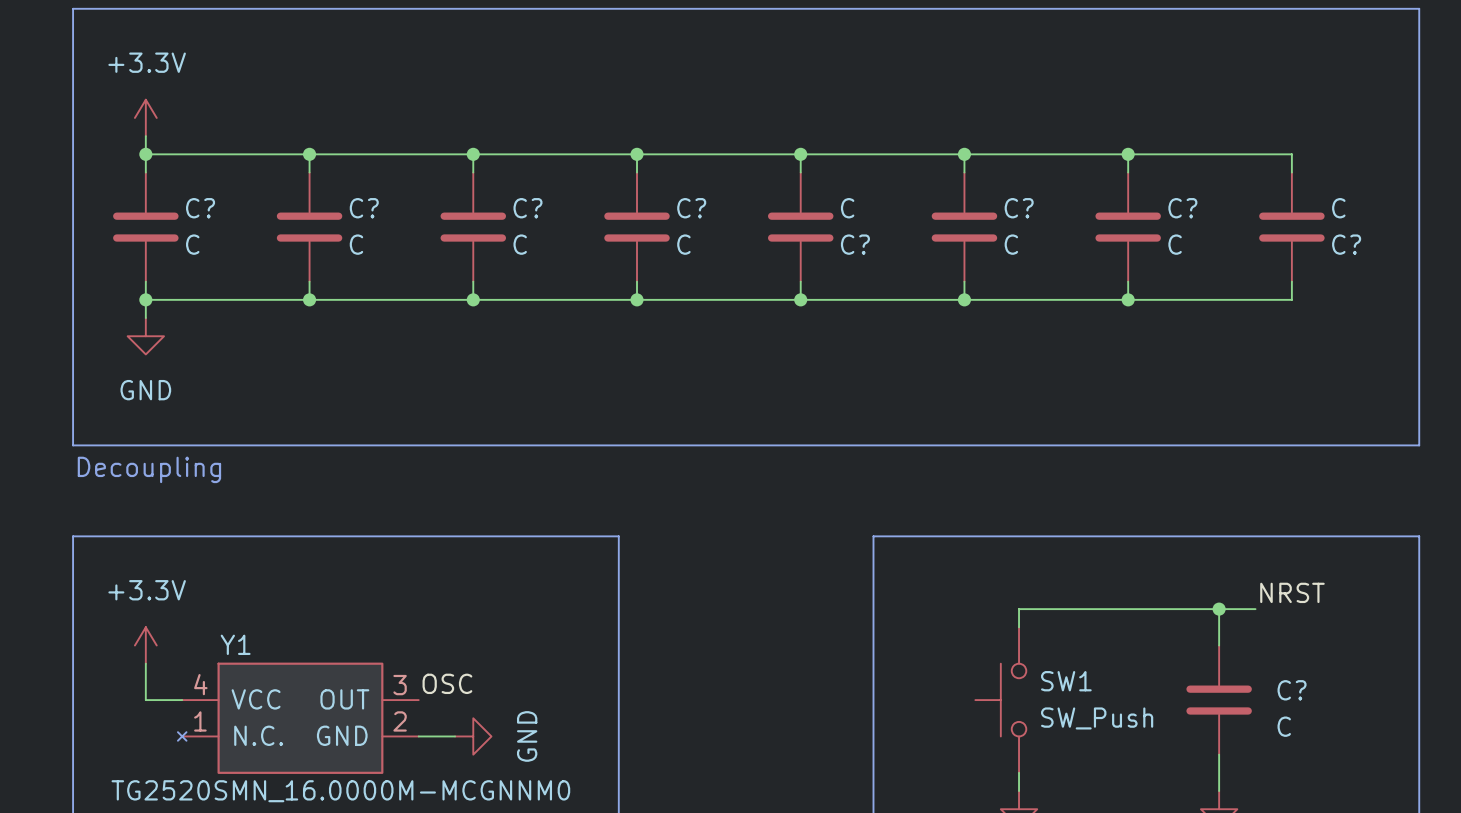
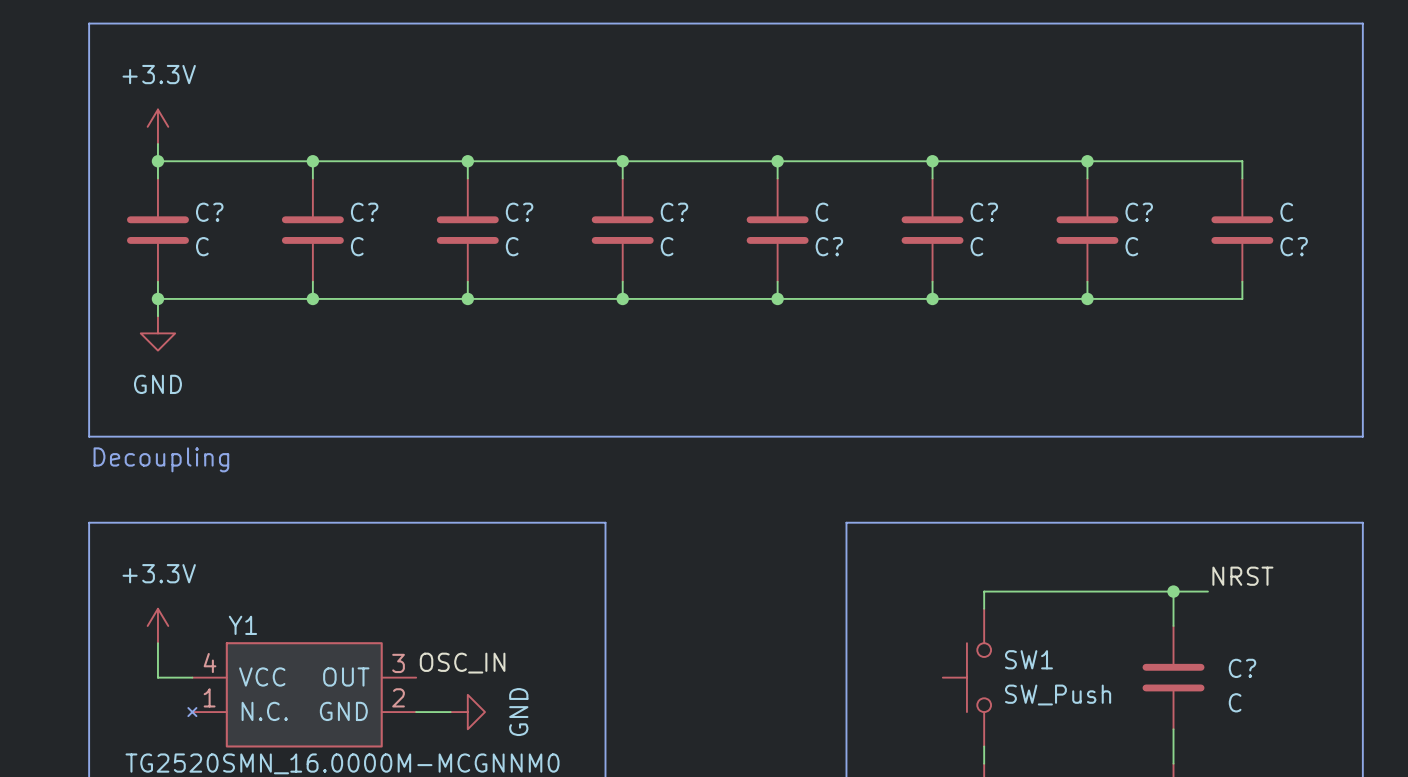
label: OSC (447, 683) -> OSC_IN (462, 663)

